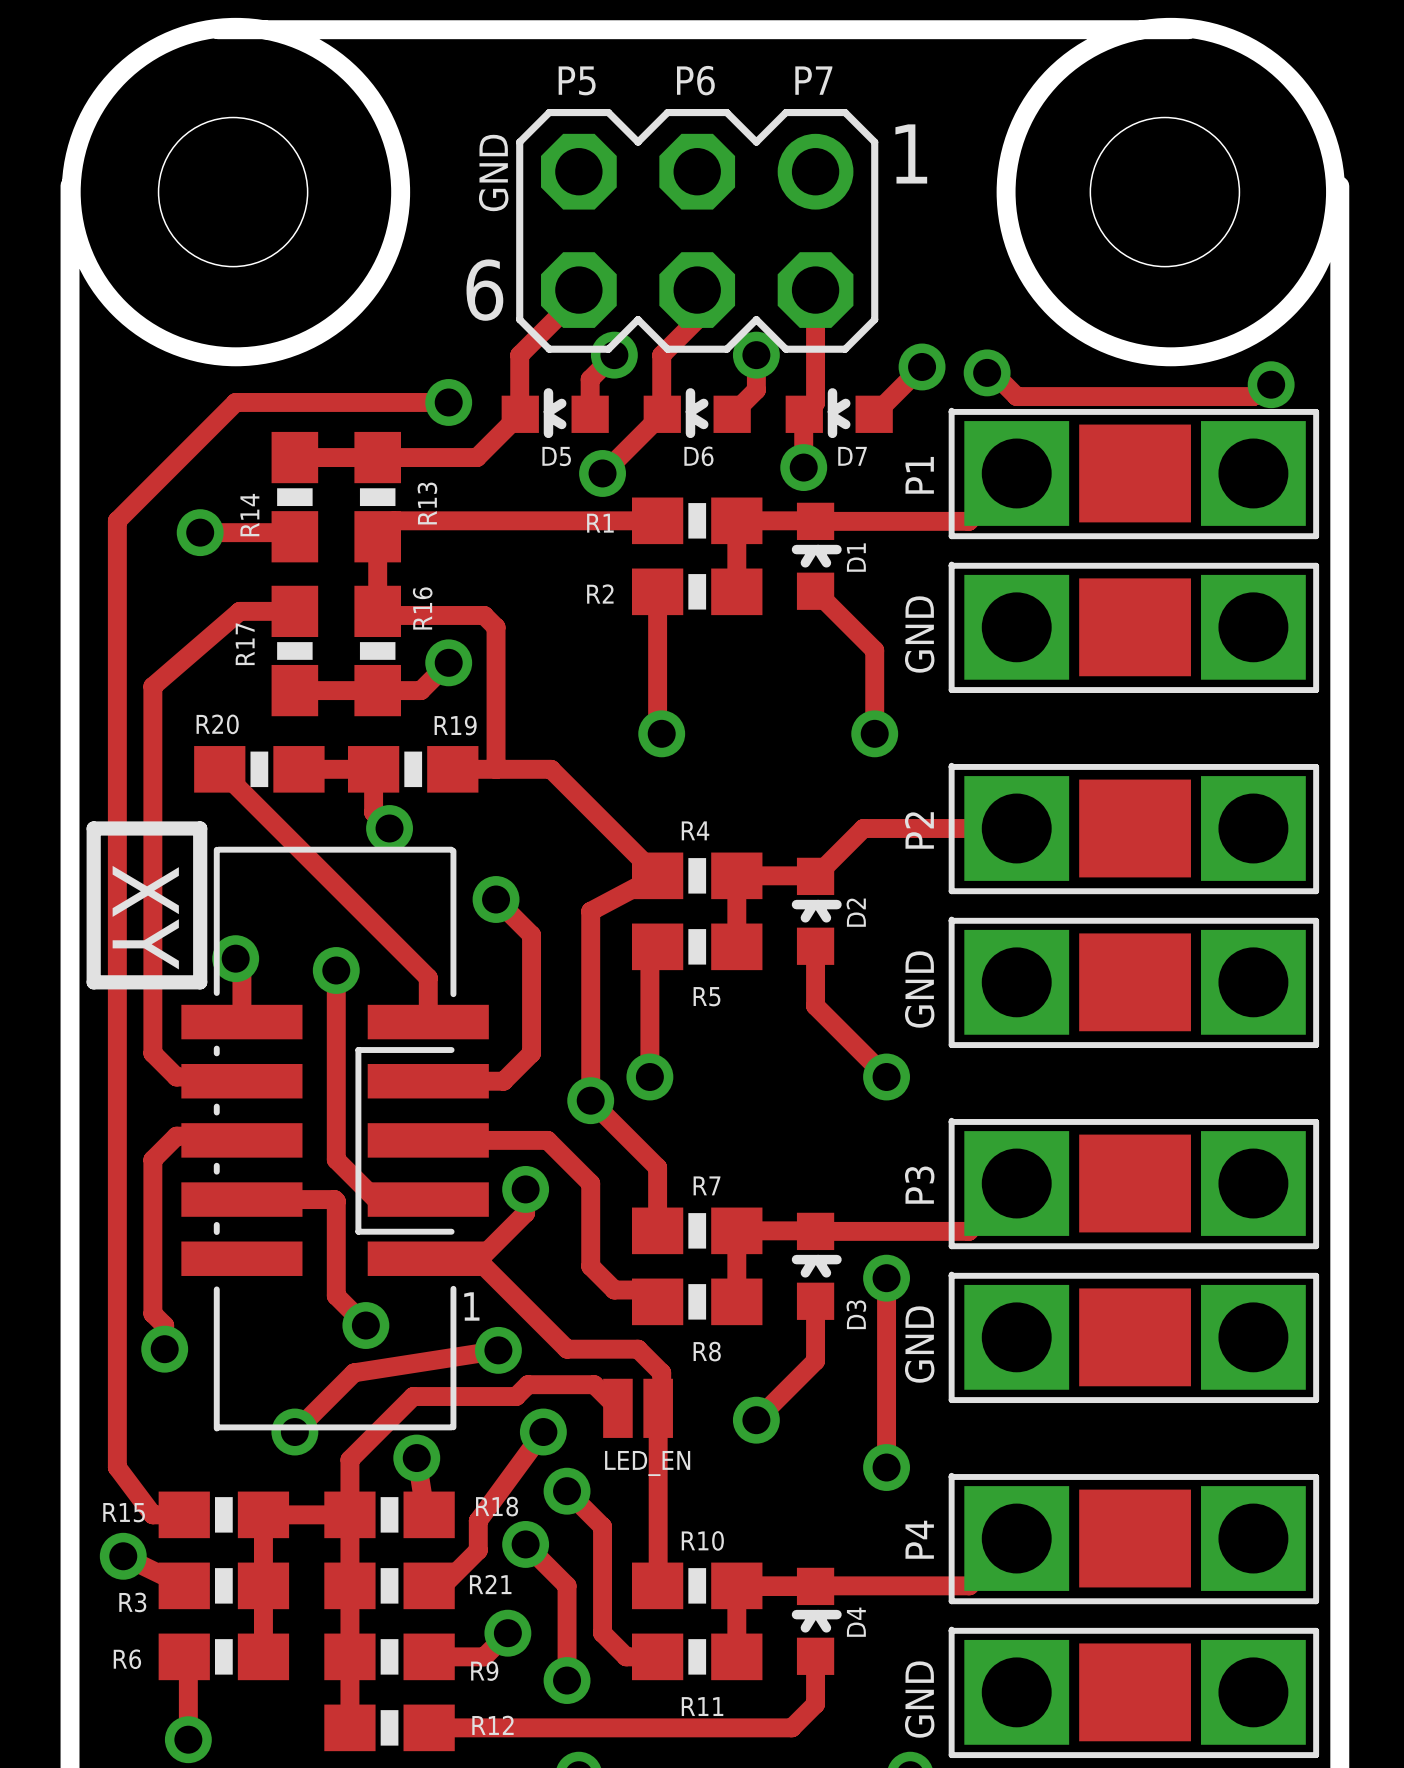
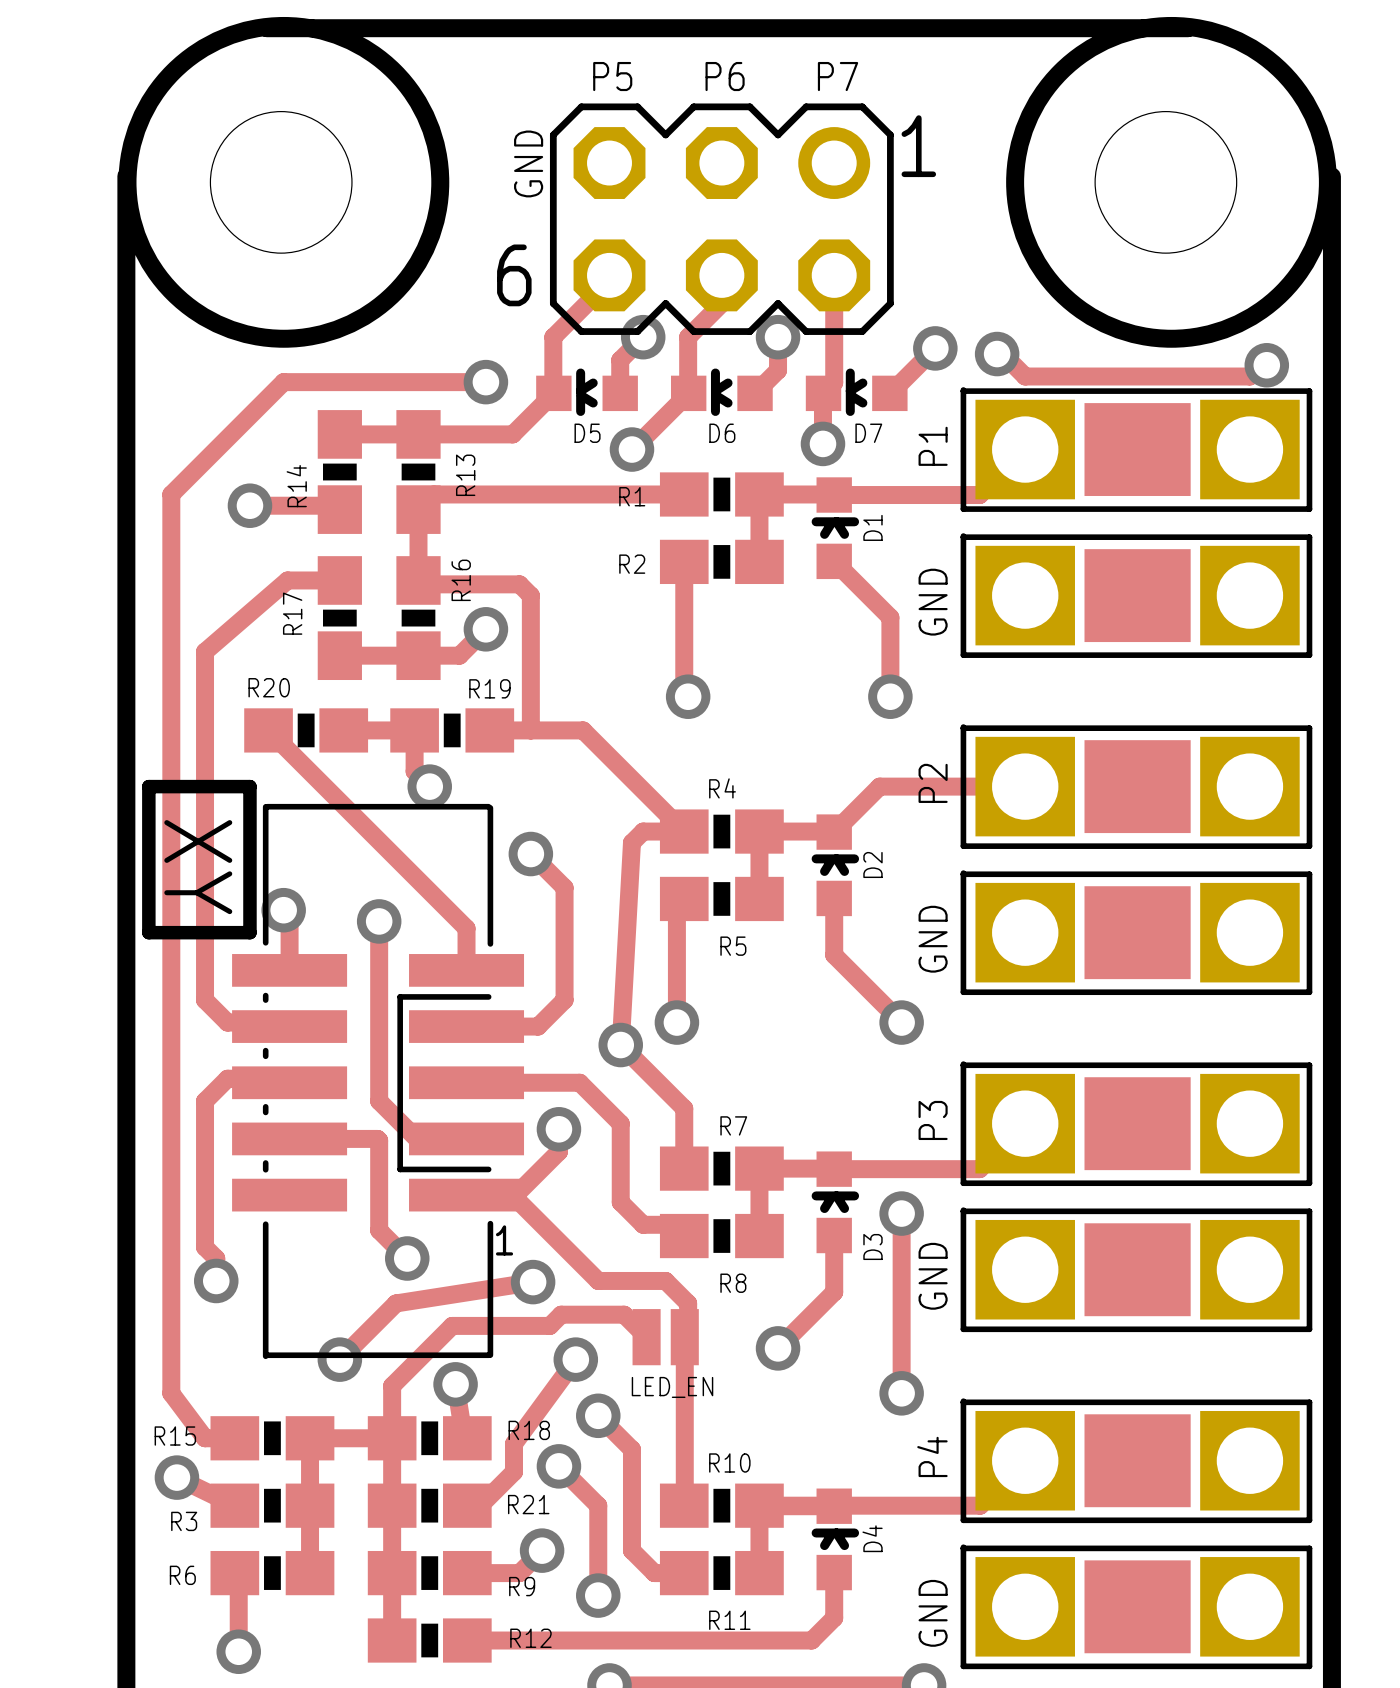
track: (657, 875) (590, 911) (590, 1100) -> (684, 831) (643, 831) (631, 842) (620, 1045)

